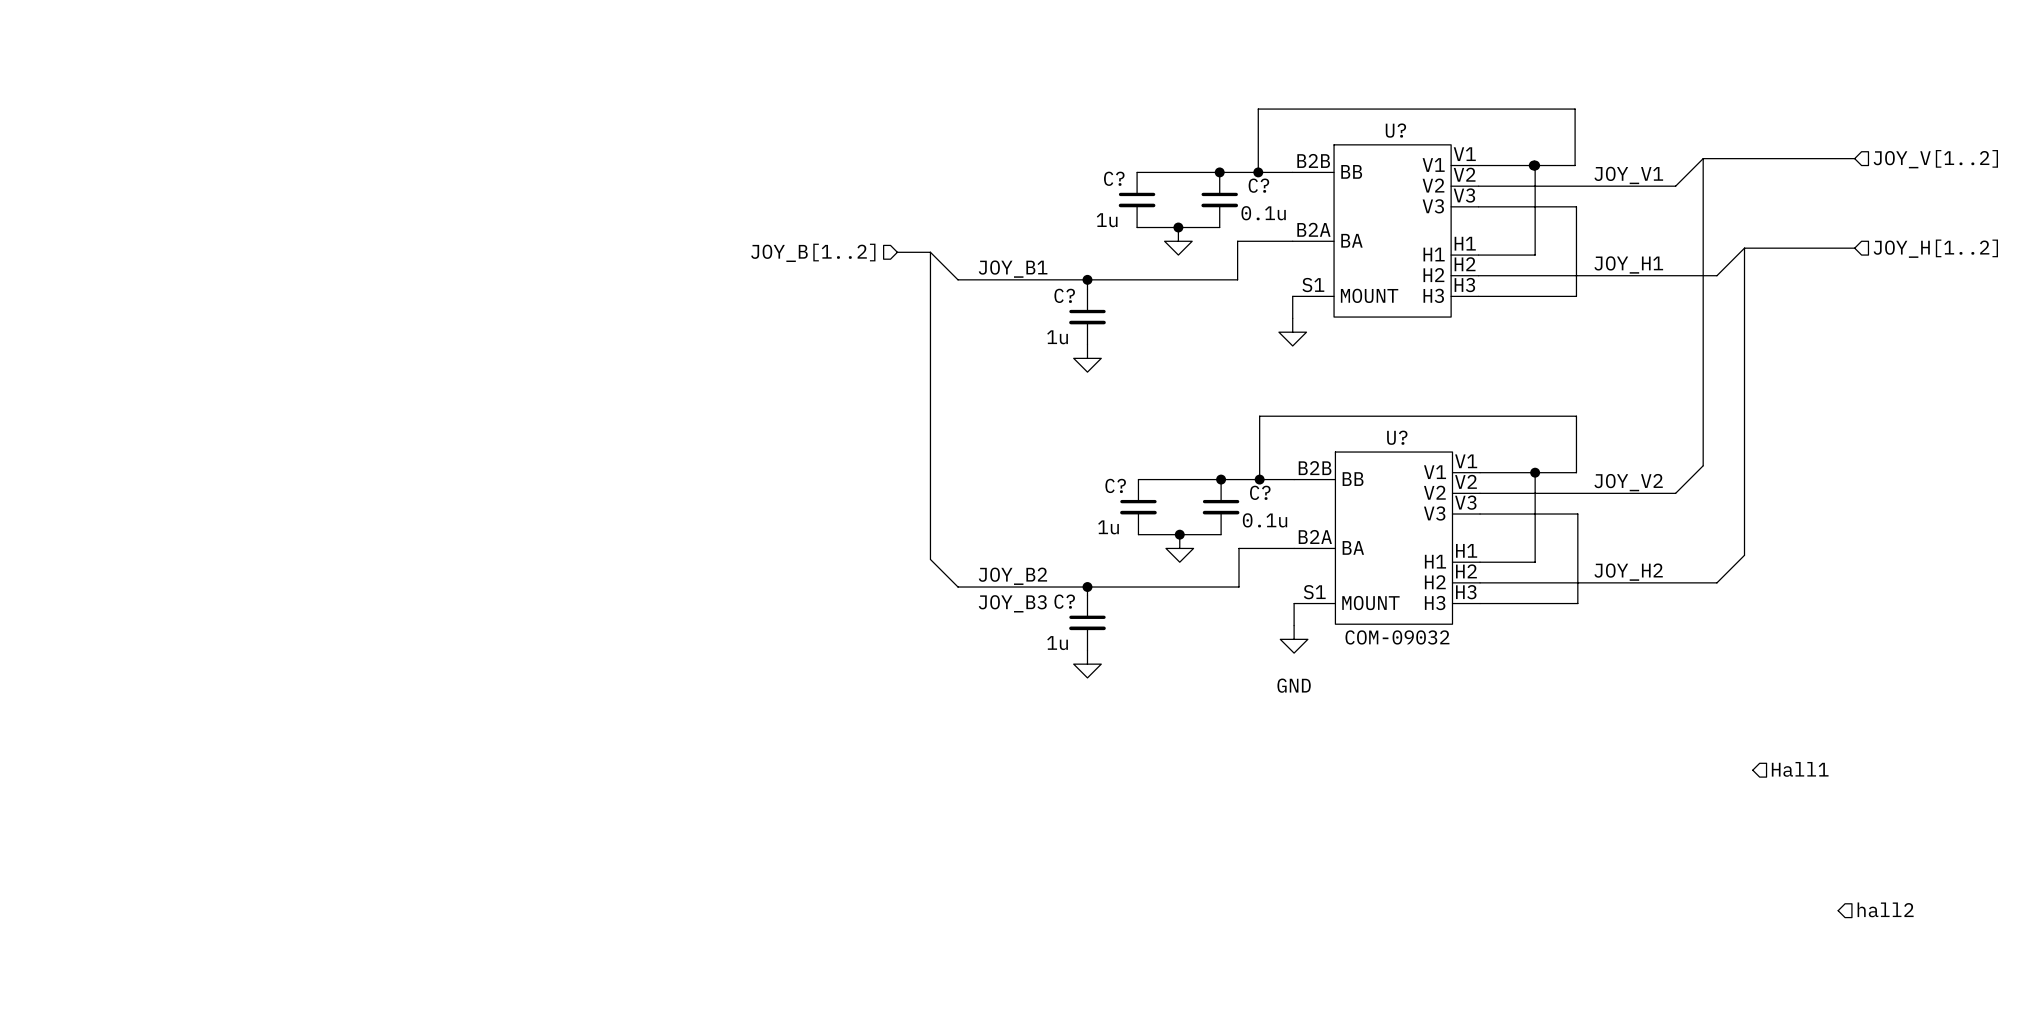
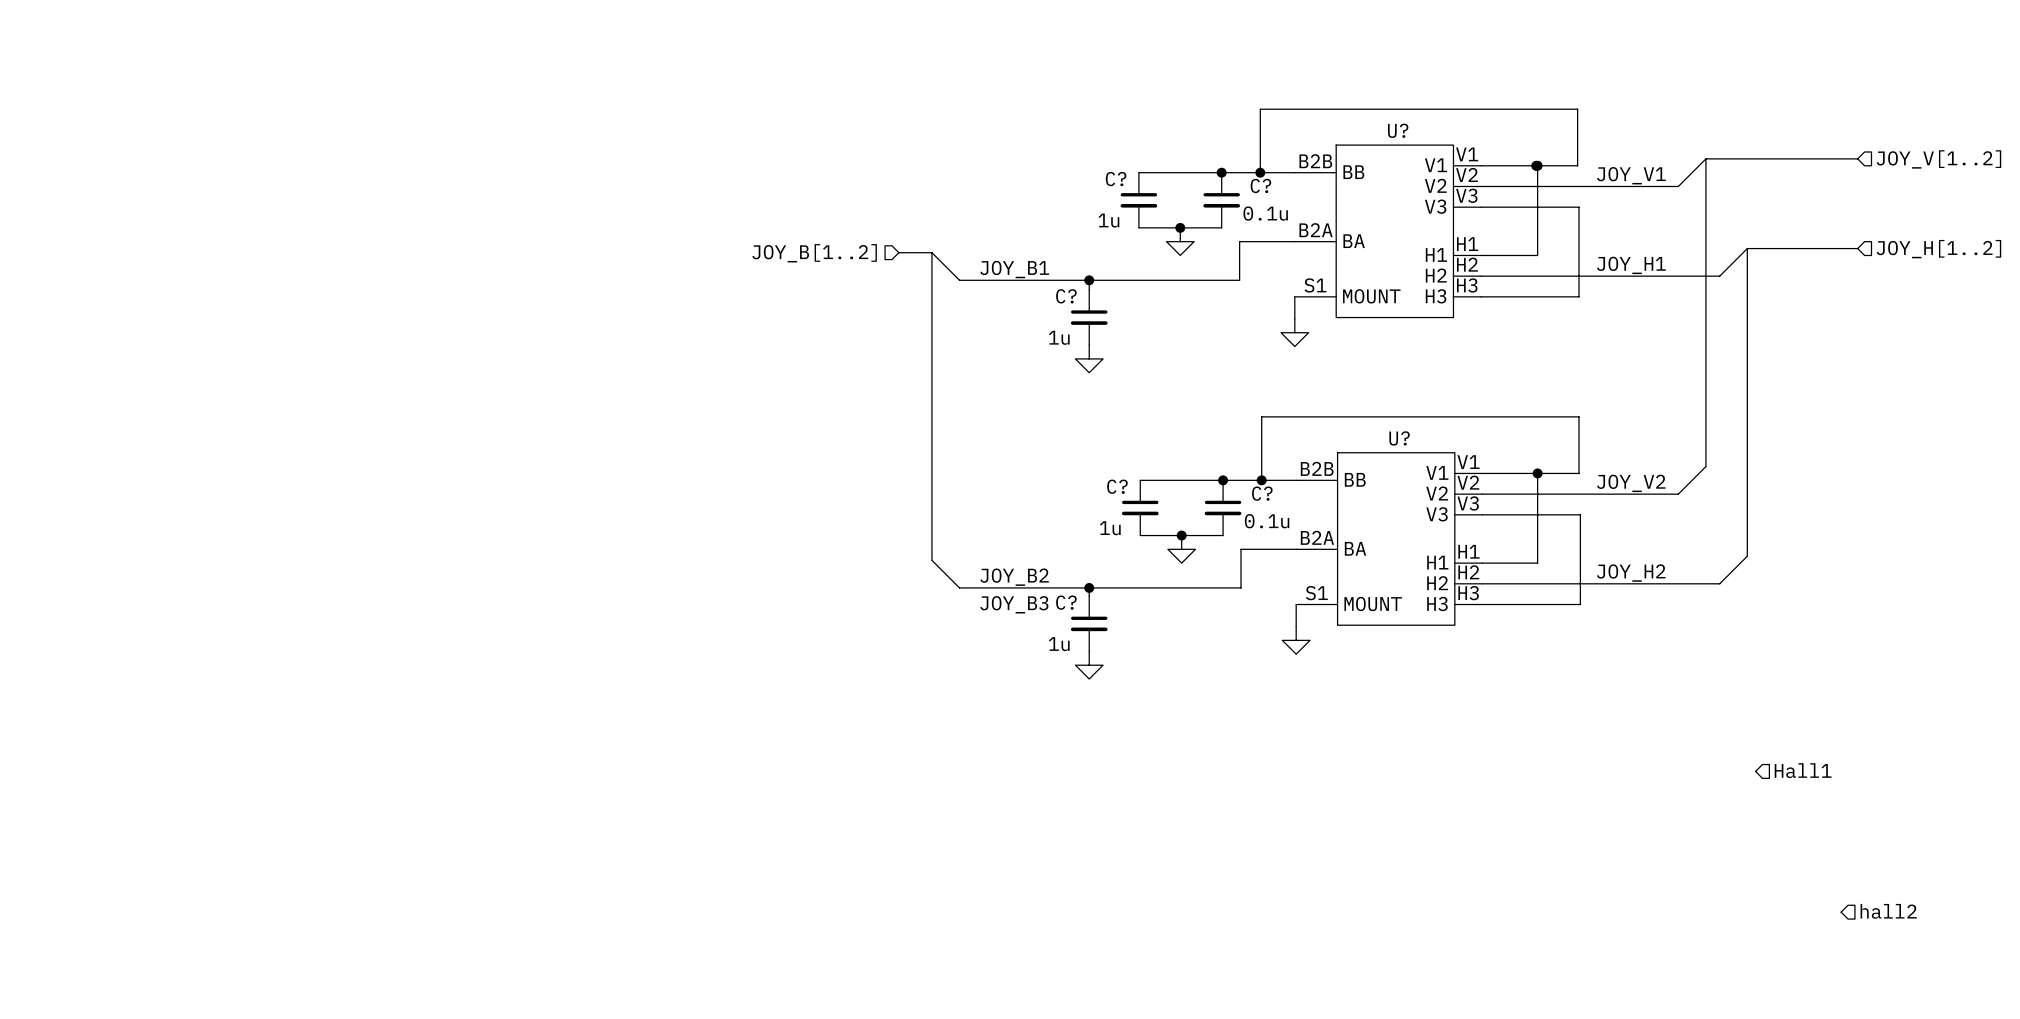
U? value: COM-09032 (1397, 637) -> none
power symbol text: GND (1294, 685) -> none

